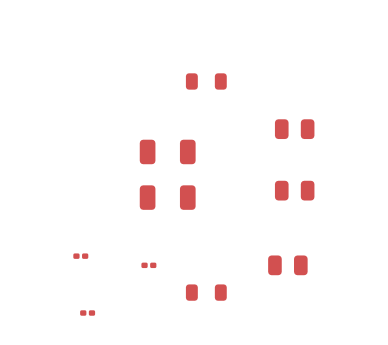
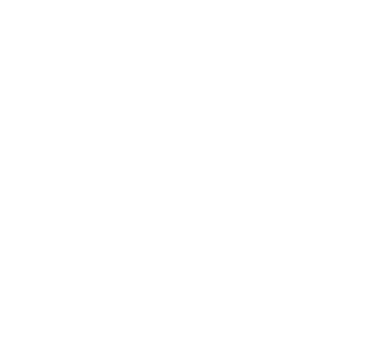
part: (206, 81) -> none
part: (294, 129) -> none
part: (167, 151) -> none
part: (294, 190) -> none
part: (167, 197) -> none
part: (80, 256) -> none
part: (148, 265) -> none
part: (287, 265) -> none
part: (206, 292) -> none
part: (87, 313) -> none

